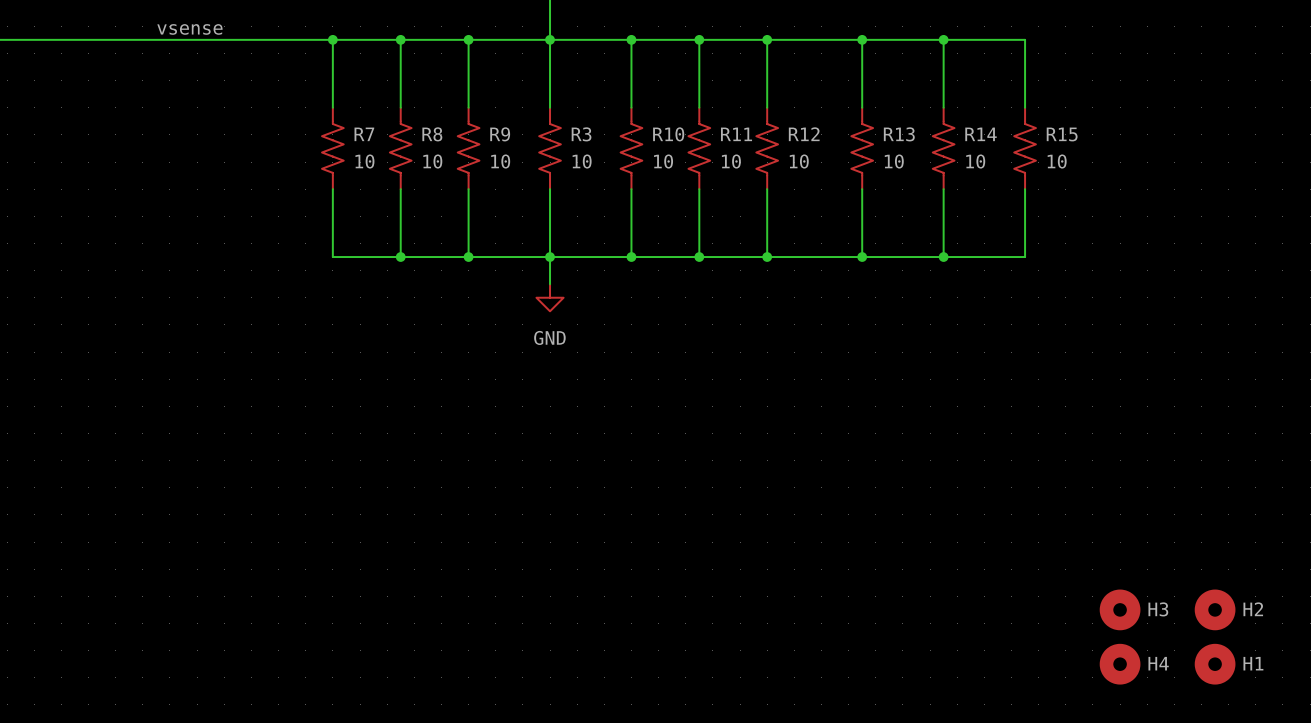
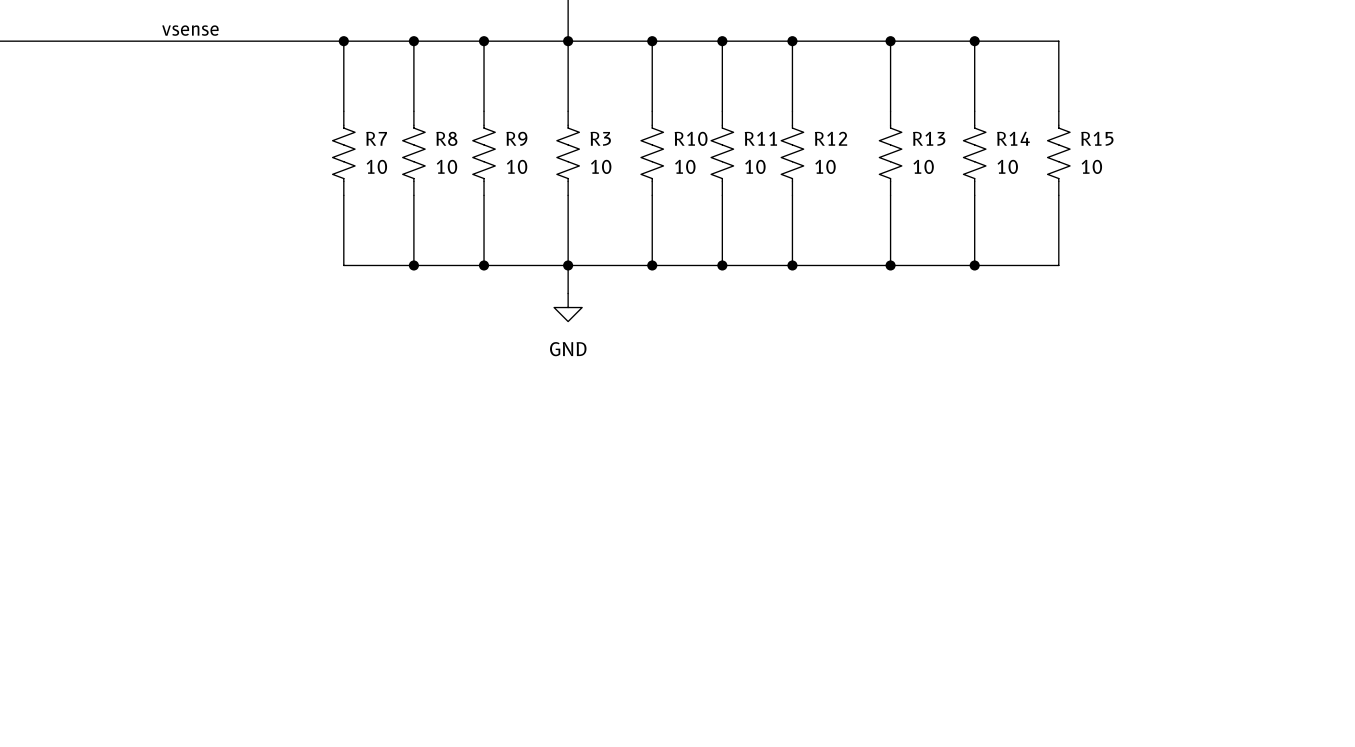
H3: (1120, 609) -> none
H2: (1215, 609) -> none
H4: (1120, 664) -> none
H1: (1215, 664) -> none

